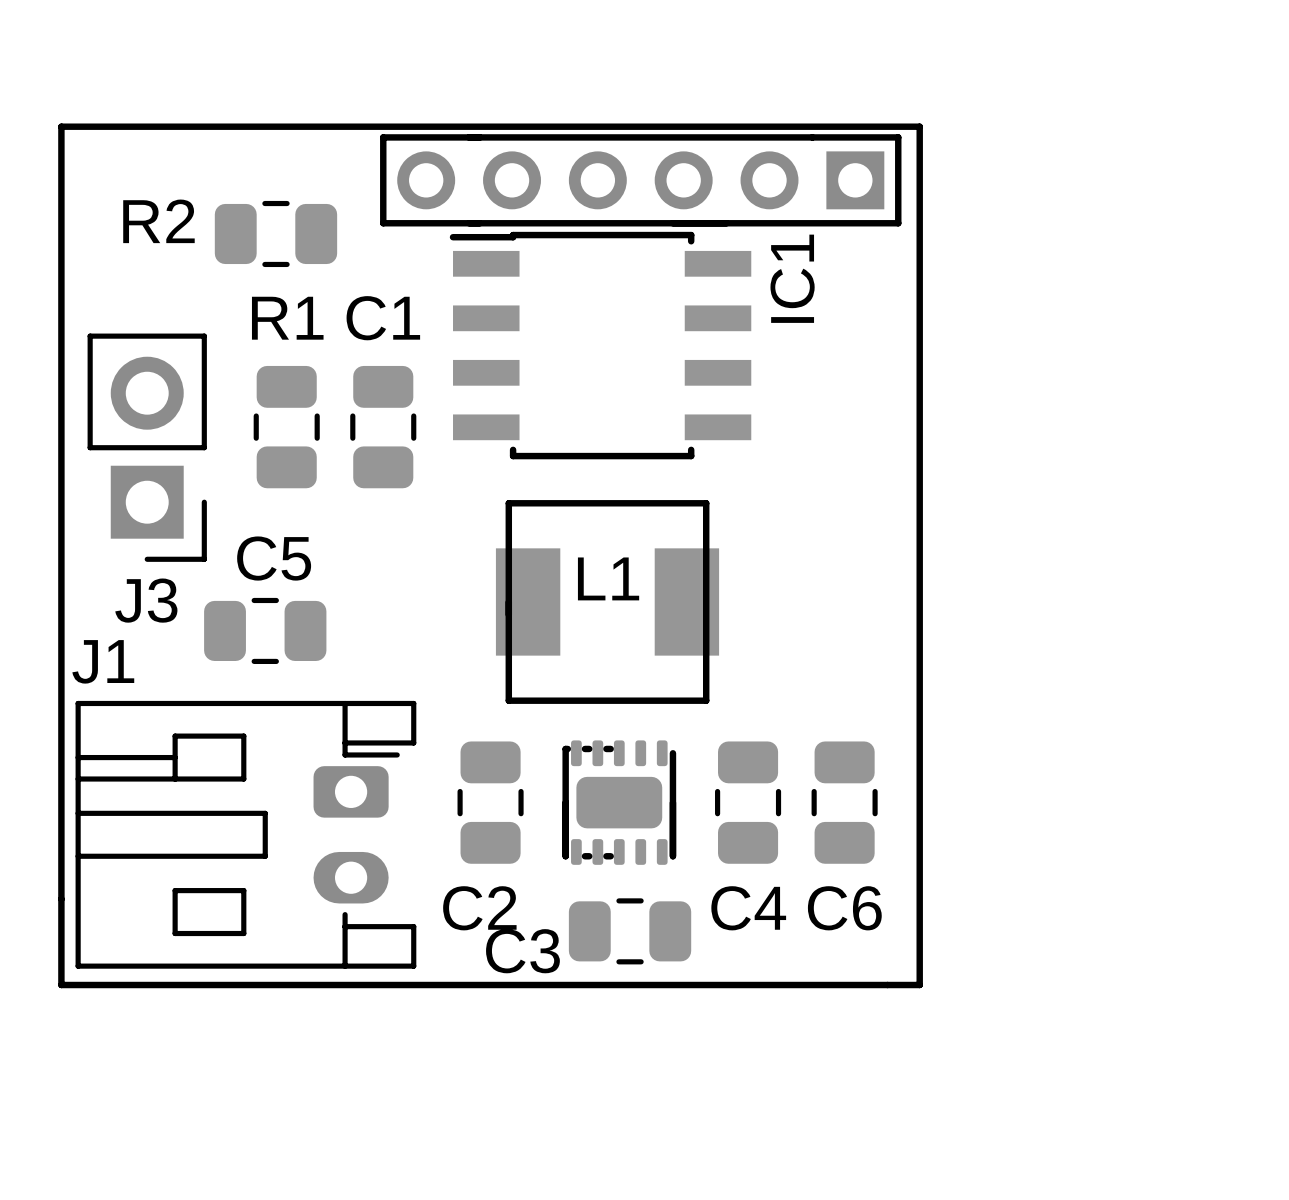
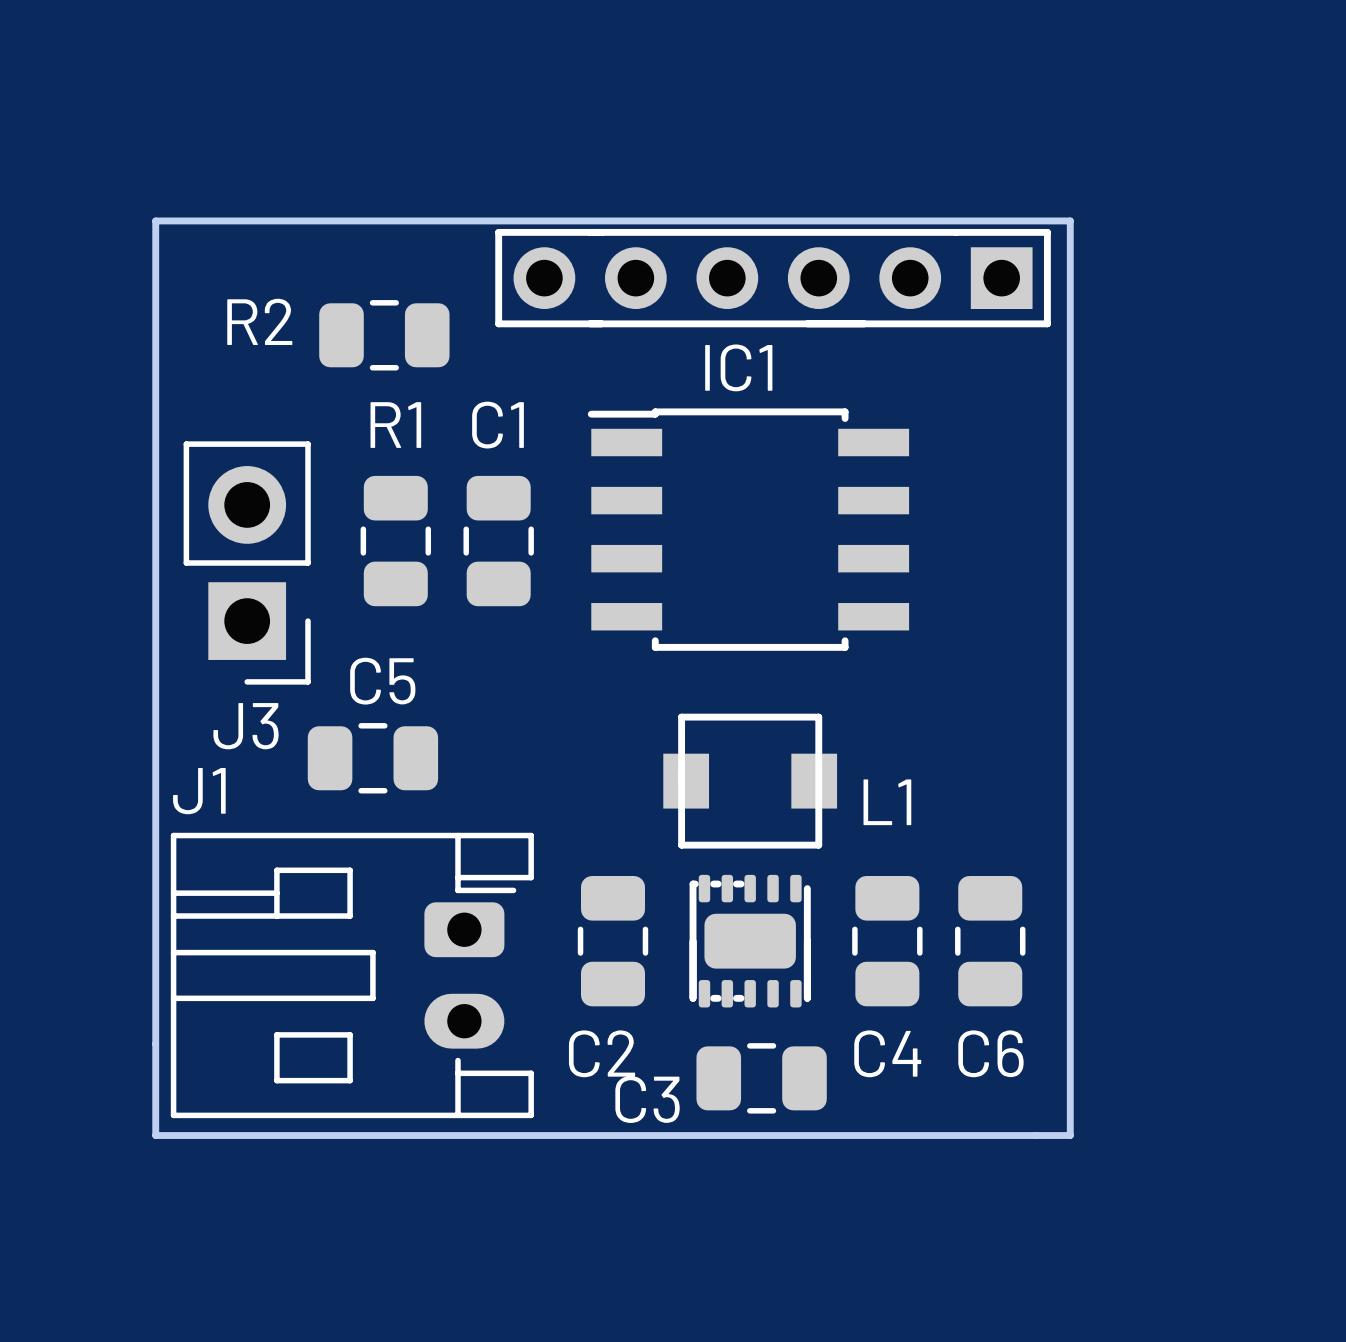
IC1 name rotation: 0° (792, 278) -> 90° clockwise (738, 367)
IC1 name position: IC1 (792, 278) -> IC1 (738, 367)
IC1 position: (600, 345) -> (748, 529)
L1 footprint: [495, 500, 720, 704] -> [663, 713, 838, 849]
L1 name position: L1 (608, 578) -> L1 (887, 802)

